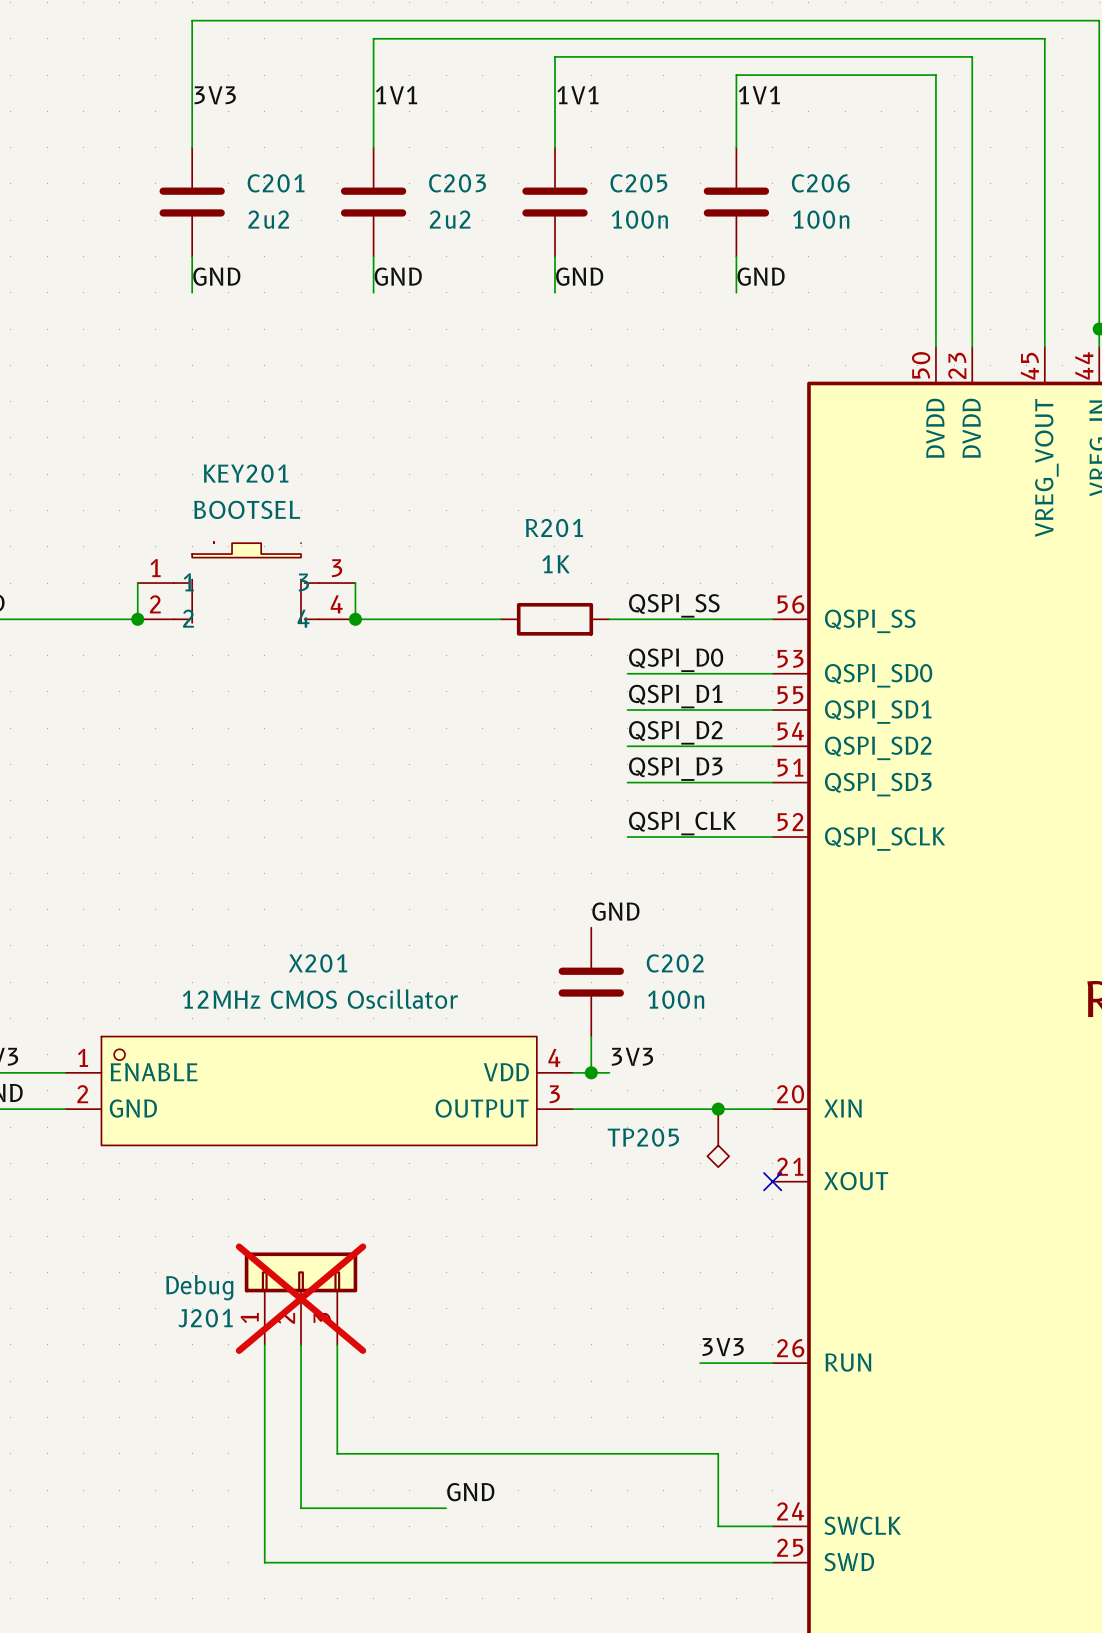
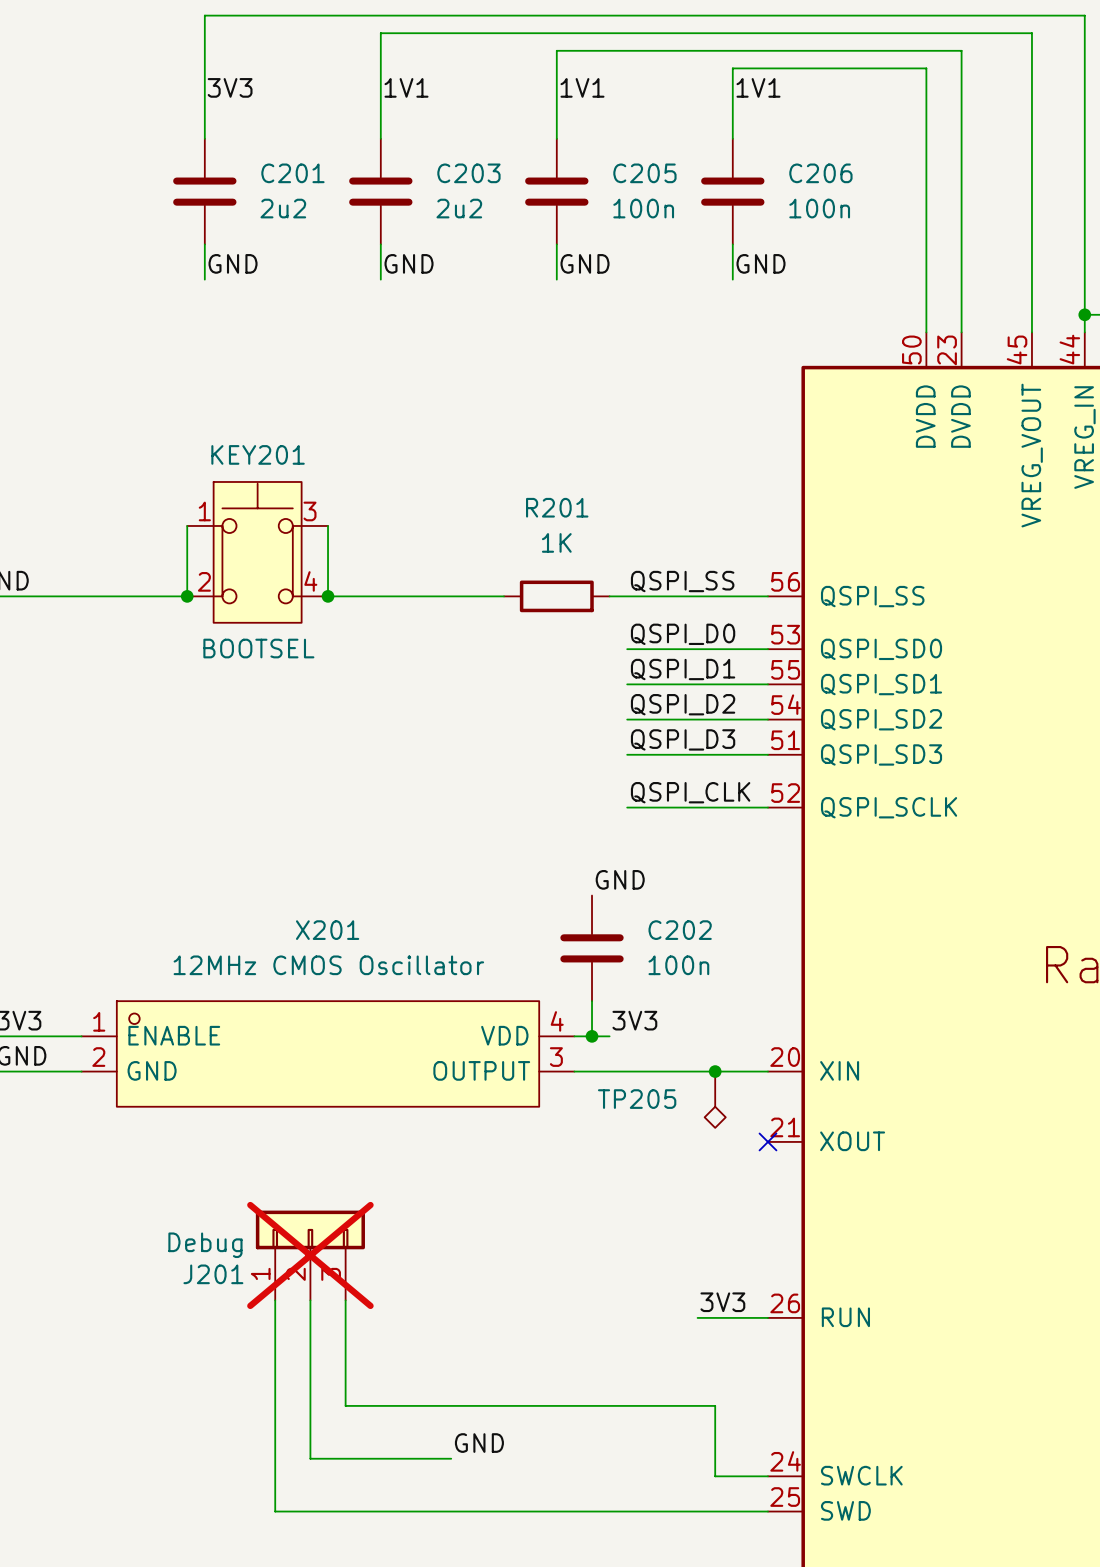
KEY201 value position: BOOTSEL (247, 509) -> BOOTSEL (258, 648)
KEY201 symbol: [137, 542, 356, 623] -> [187, 481, 329, 623]
wire: (137, 583) (137, 619) -> (187, 525) (187, 596) (152, 596)
wire: (355, 583) (355, 619) -> (328, 525) (328, 596) (363, 596)
junction position: (137, 619) -> (187, 596)
junction position: (355, 619) -> (328, 596)

